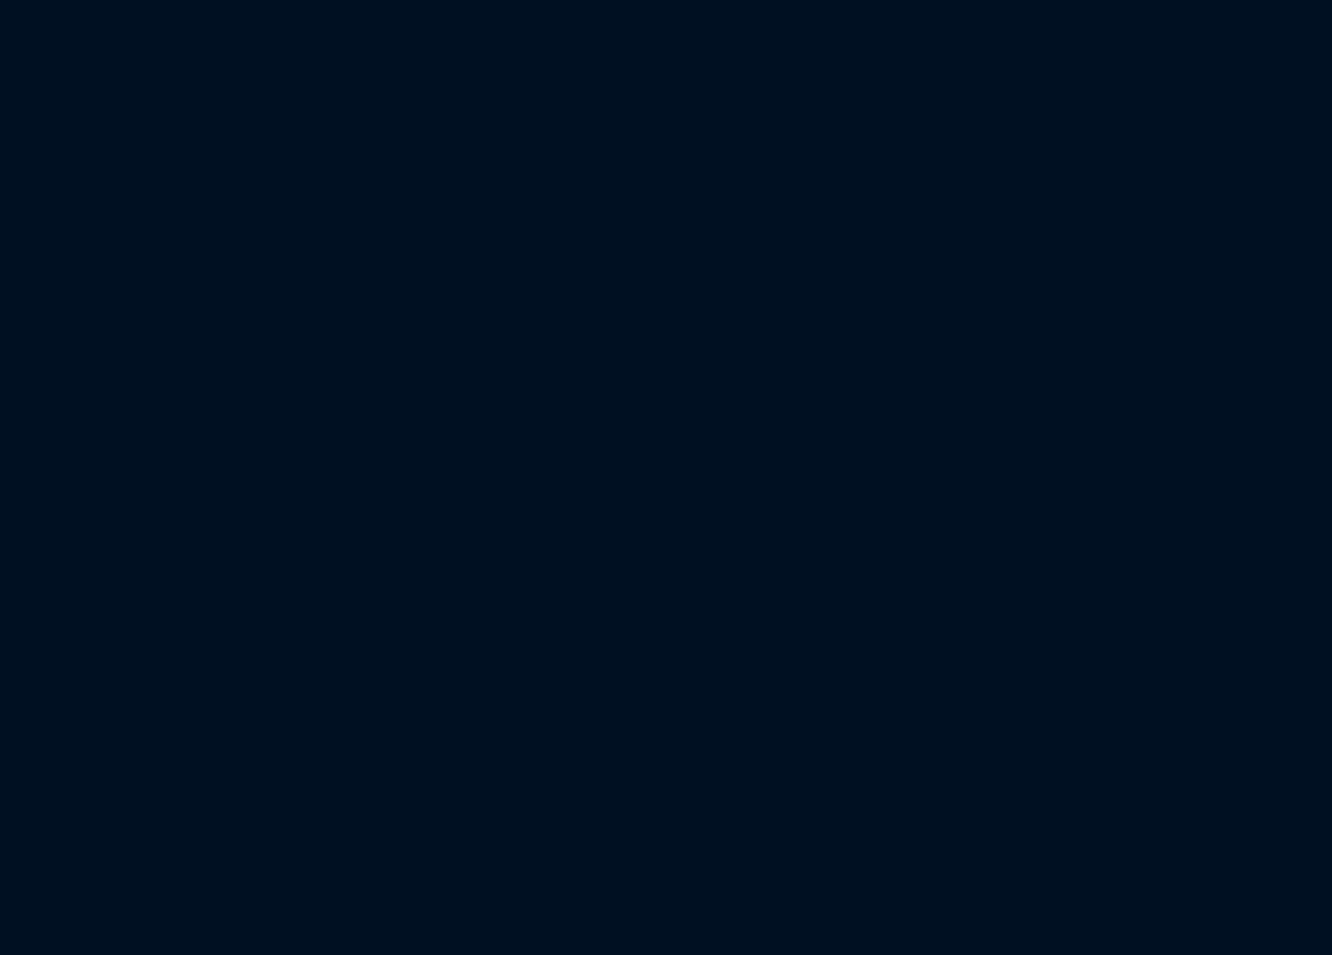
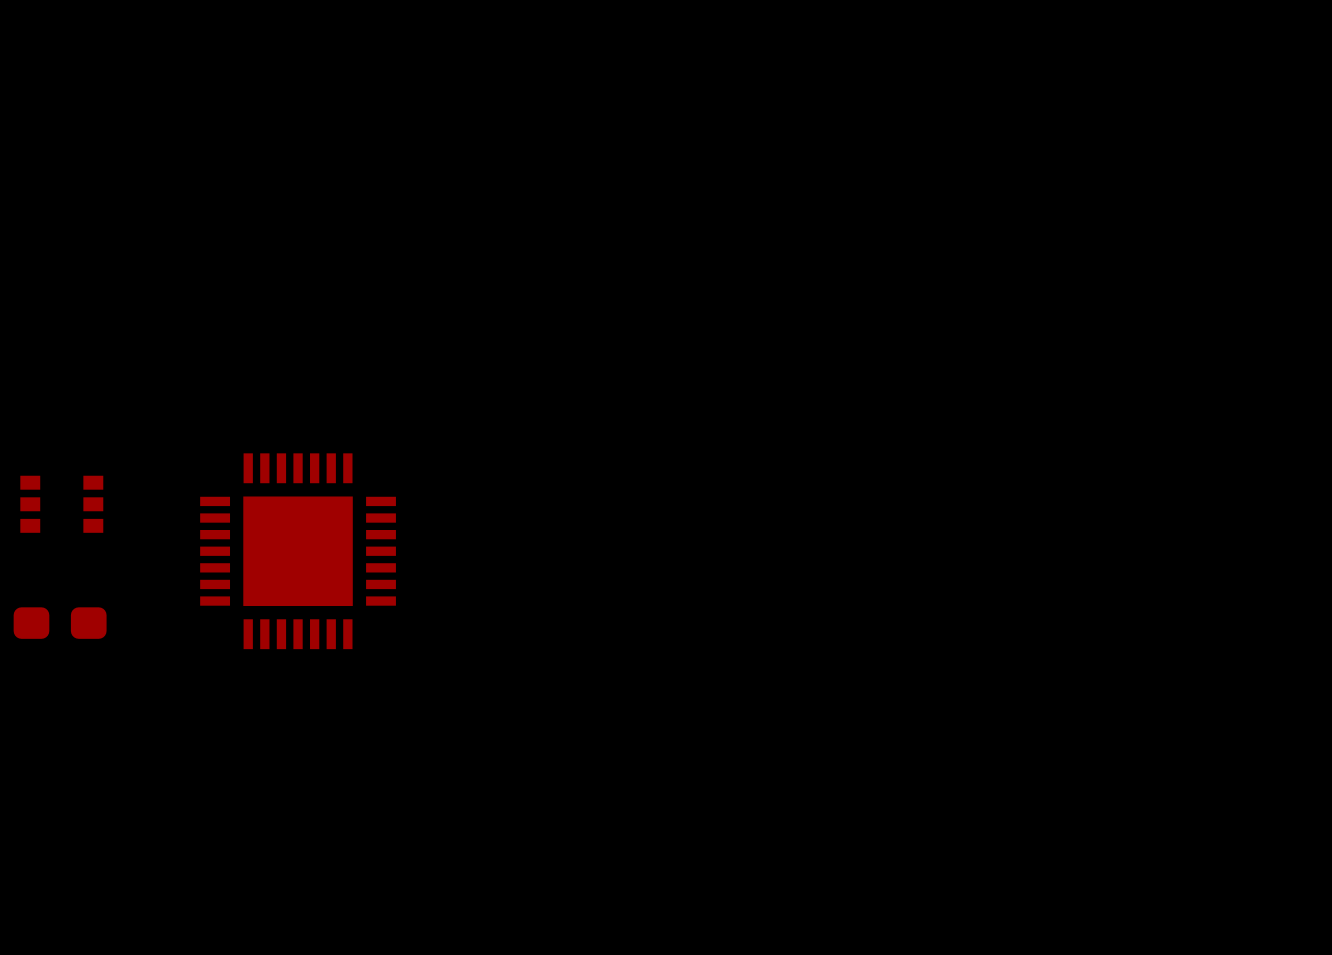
part: none -> (61, 504)
part: none -> (298, 551)
part: none -> (60, 623)

